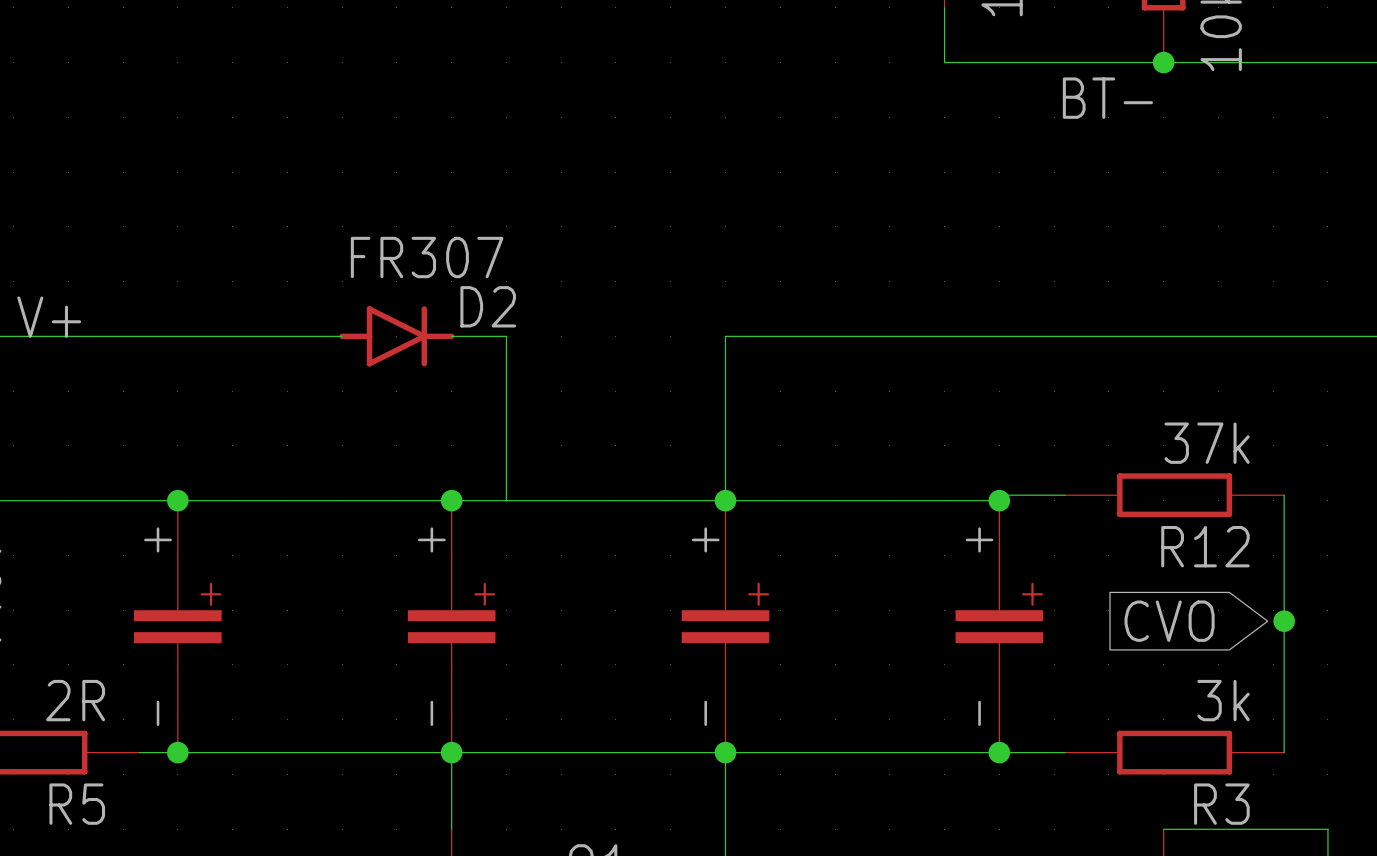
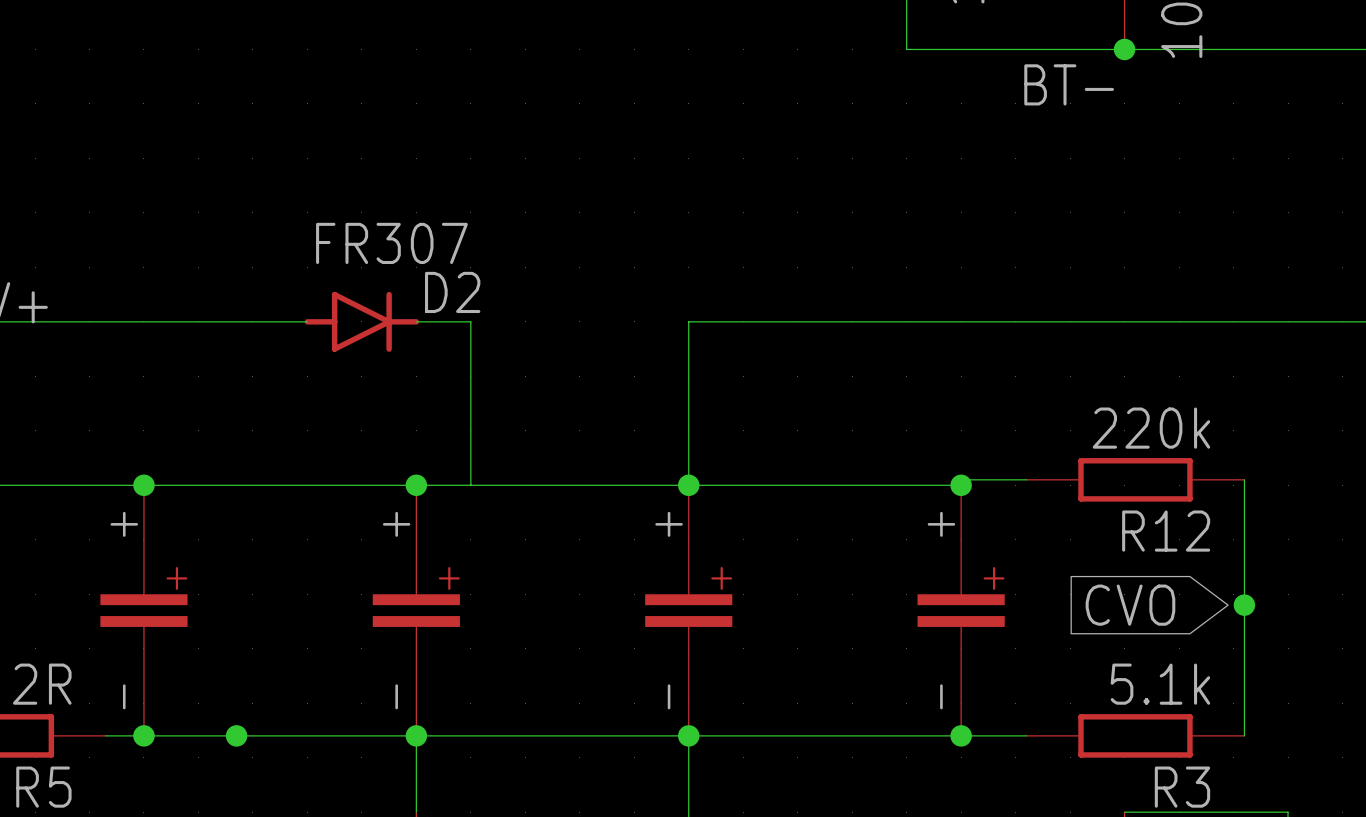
R12 value: 37k (1207, 443) -> 220k (1151, 428)
R3 value: 3k (1223, 700) -> 5.1k (1160, 684)
junction: none -> (236, 735)

